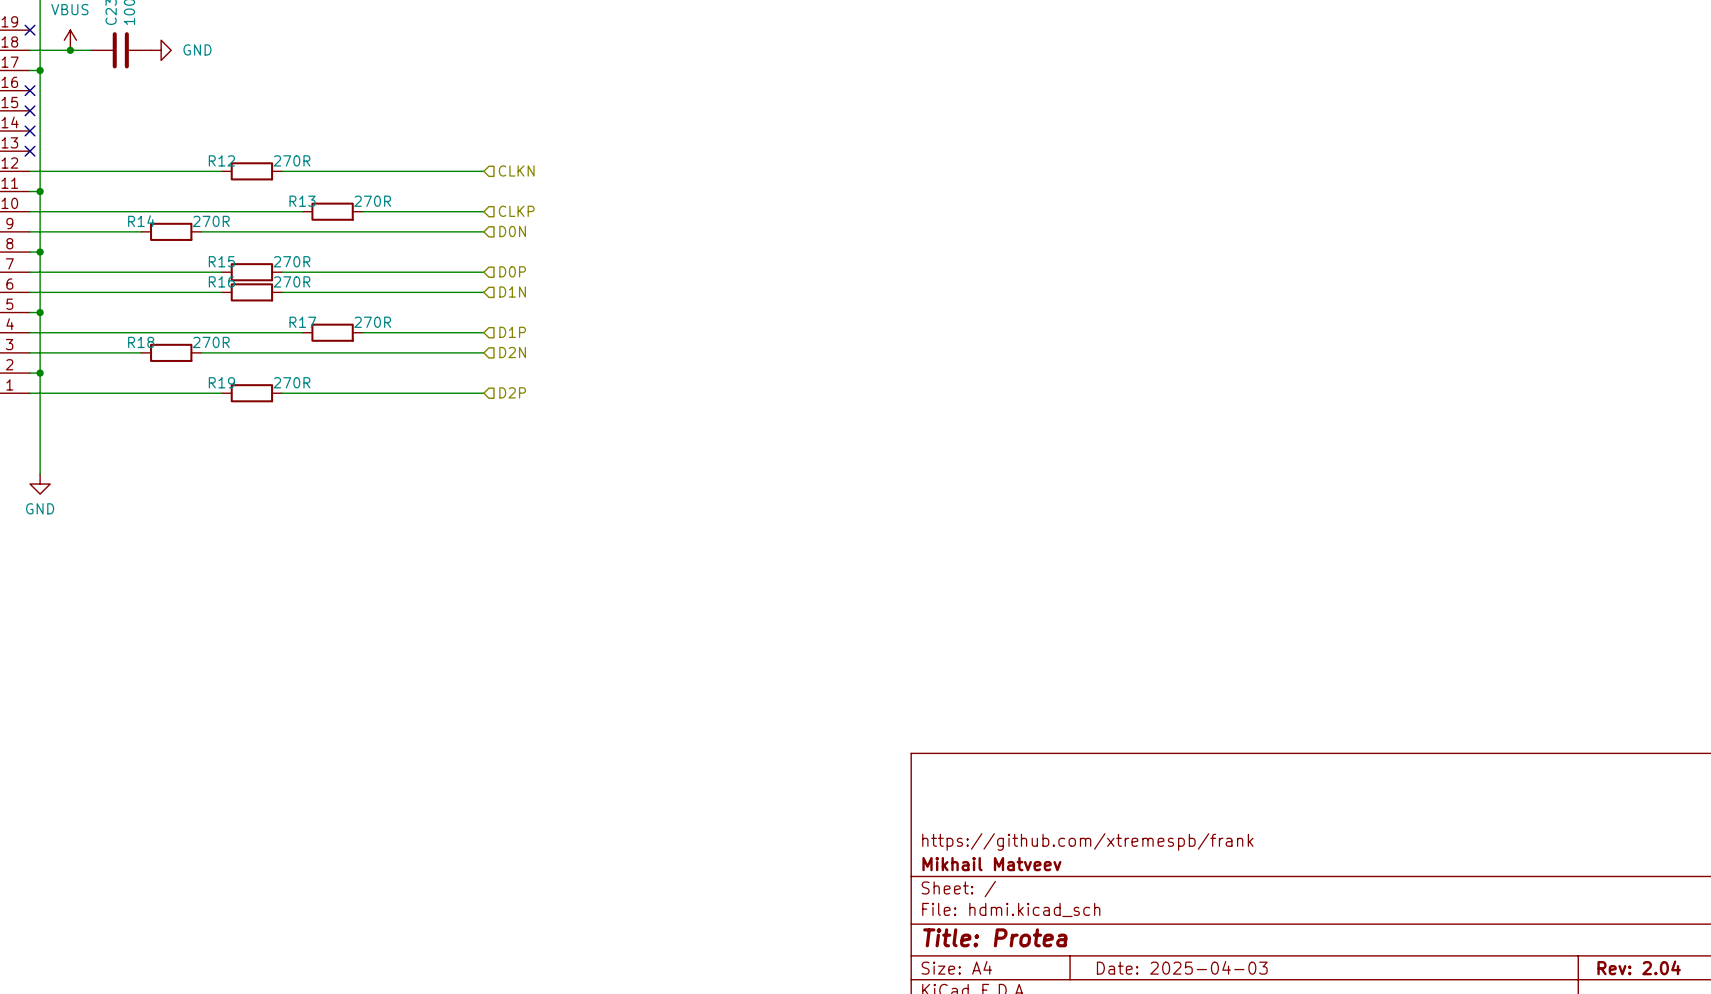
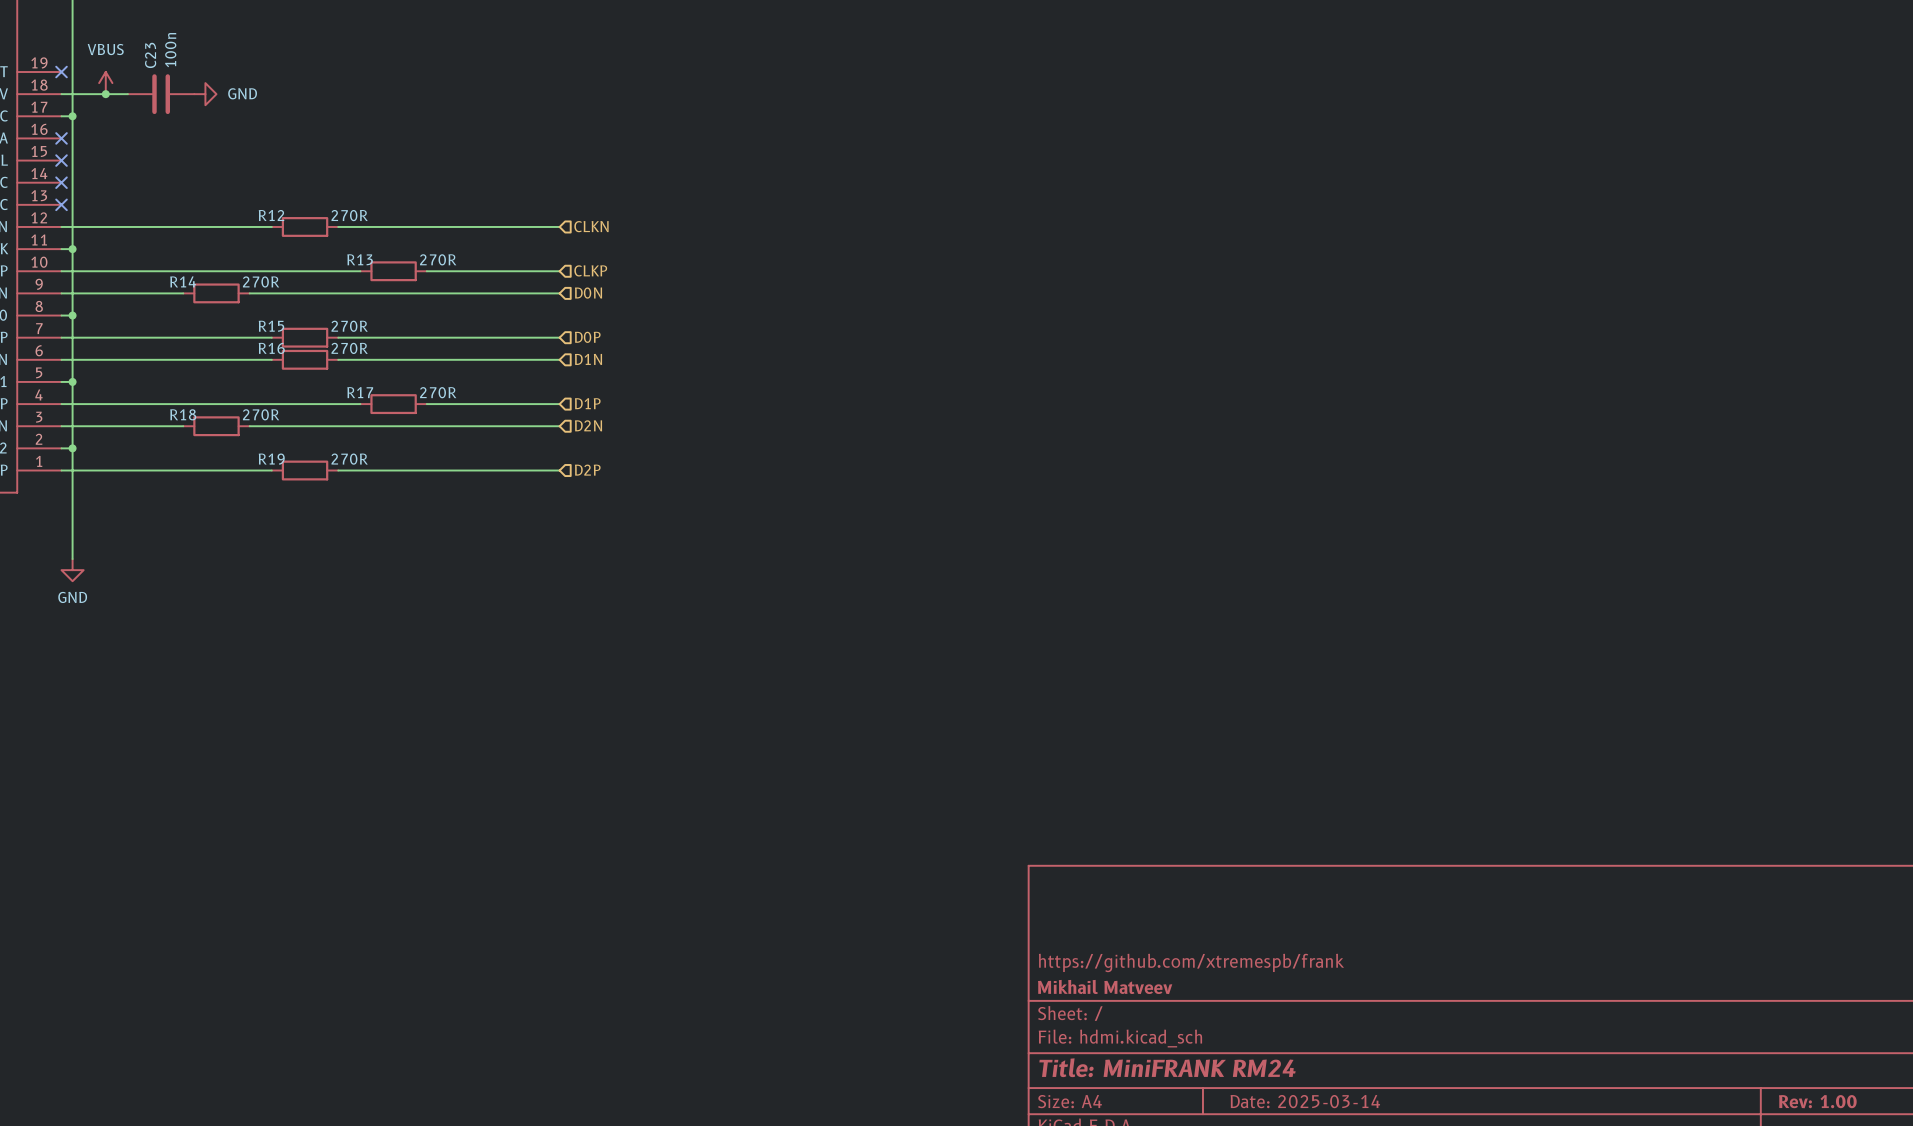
title block: Title: Protea (995, 937) -> Title: MiniFRANK RM24 (1167, 1067)
title block: Date: 2025-04-03 (1182, 967) -> Date: 2025-03-14 (1305, 1101)
title block: Rev: 2.04 (1639, 967) -> Rev: 1.00 (1817, 1101)

